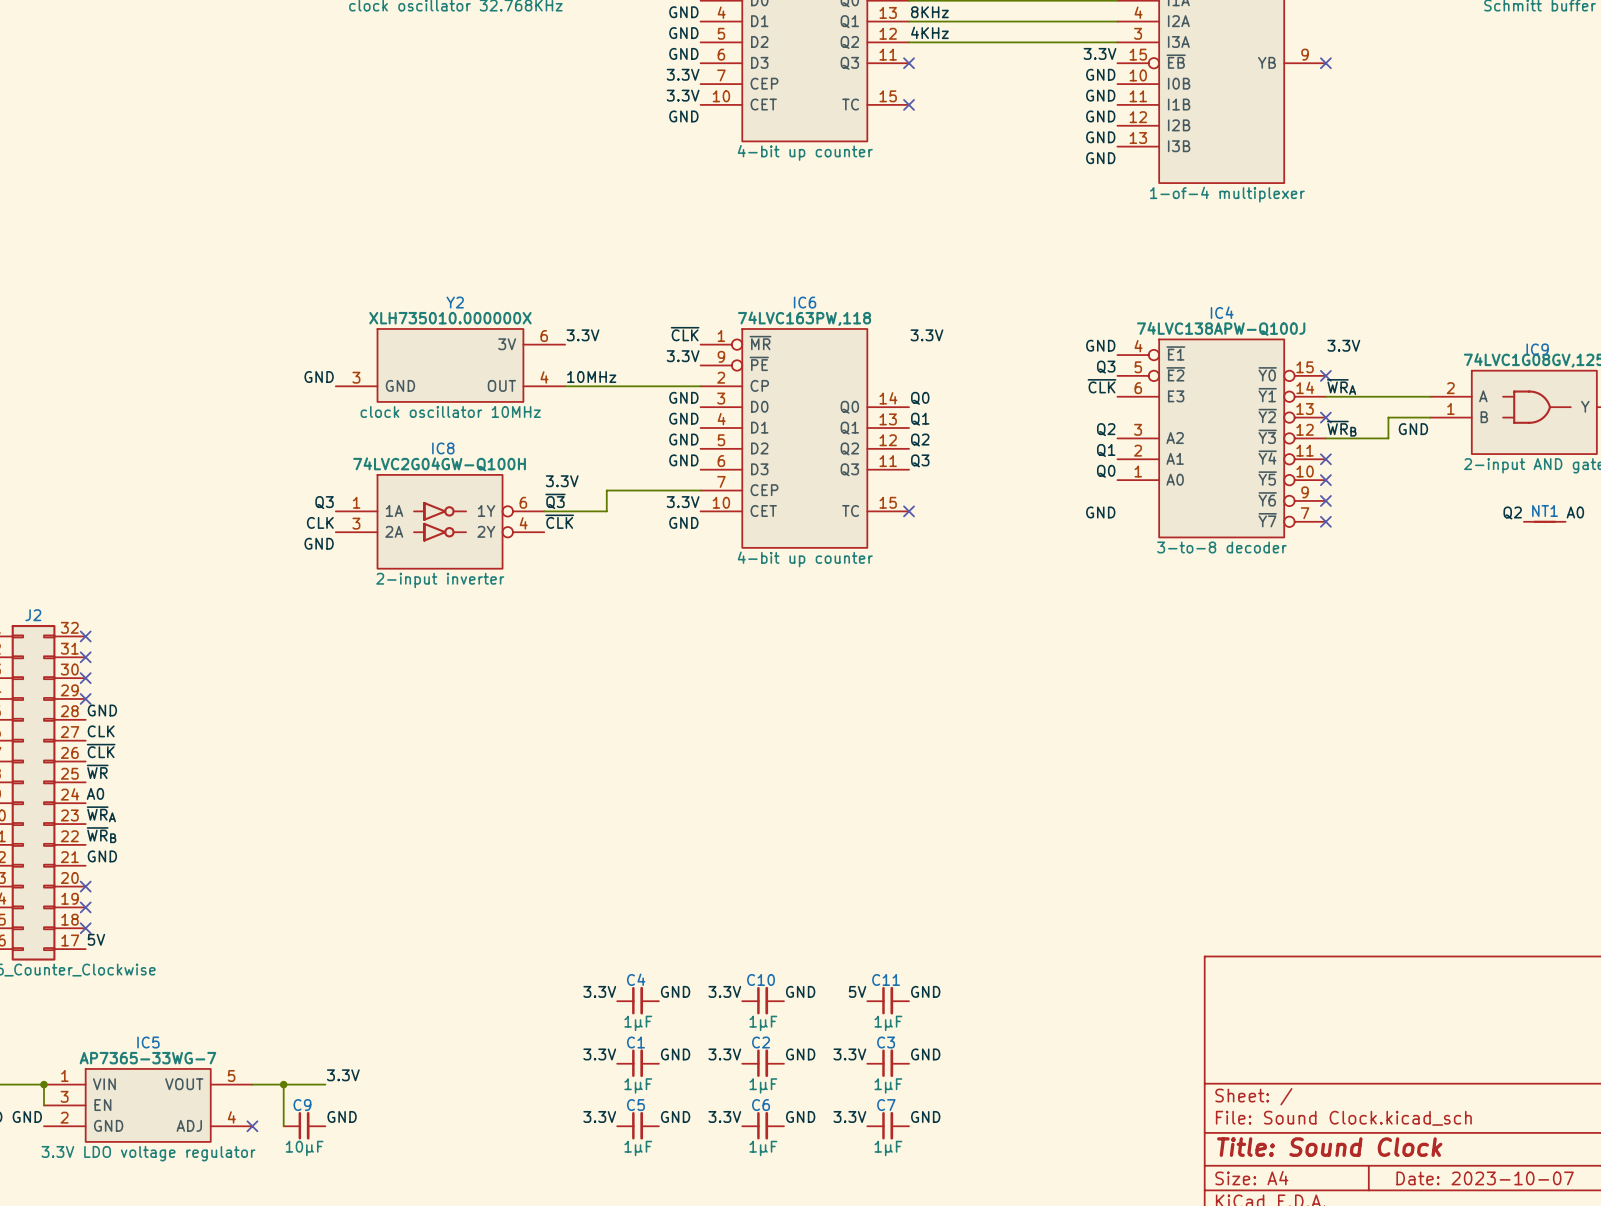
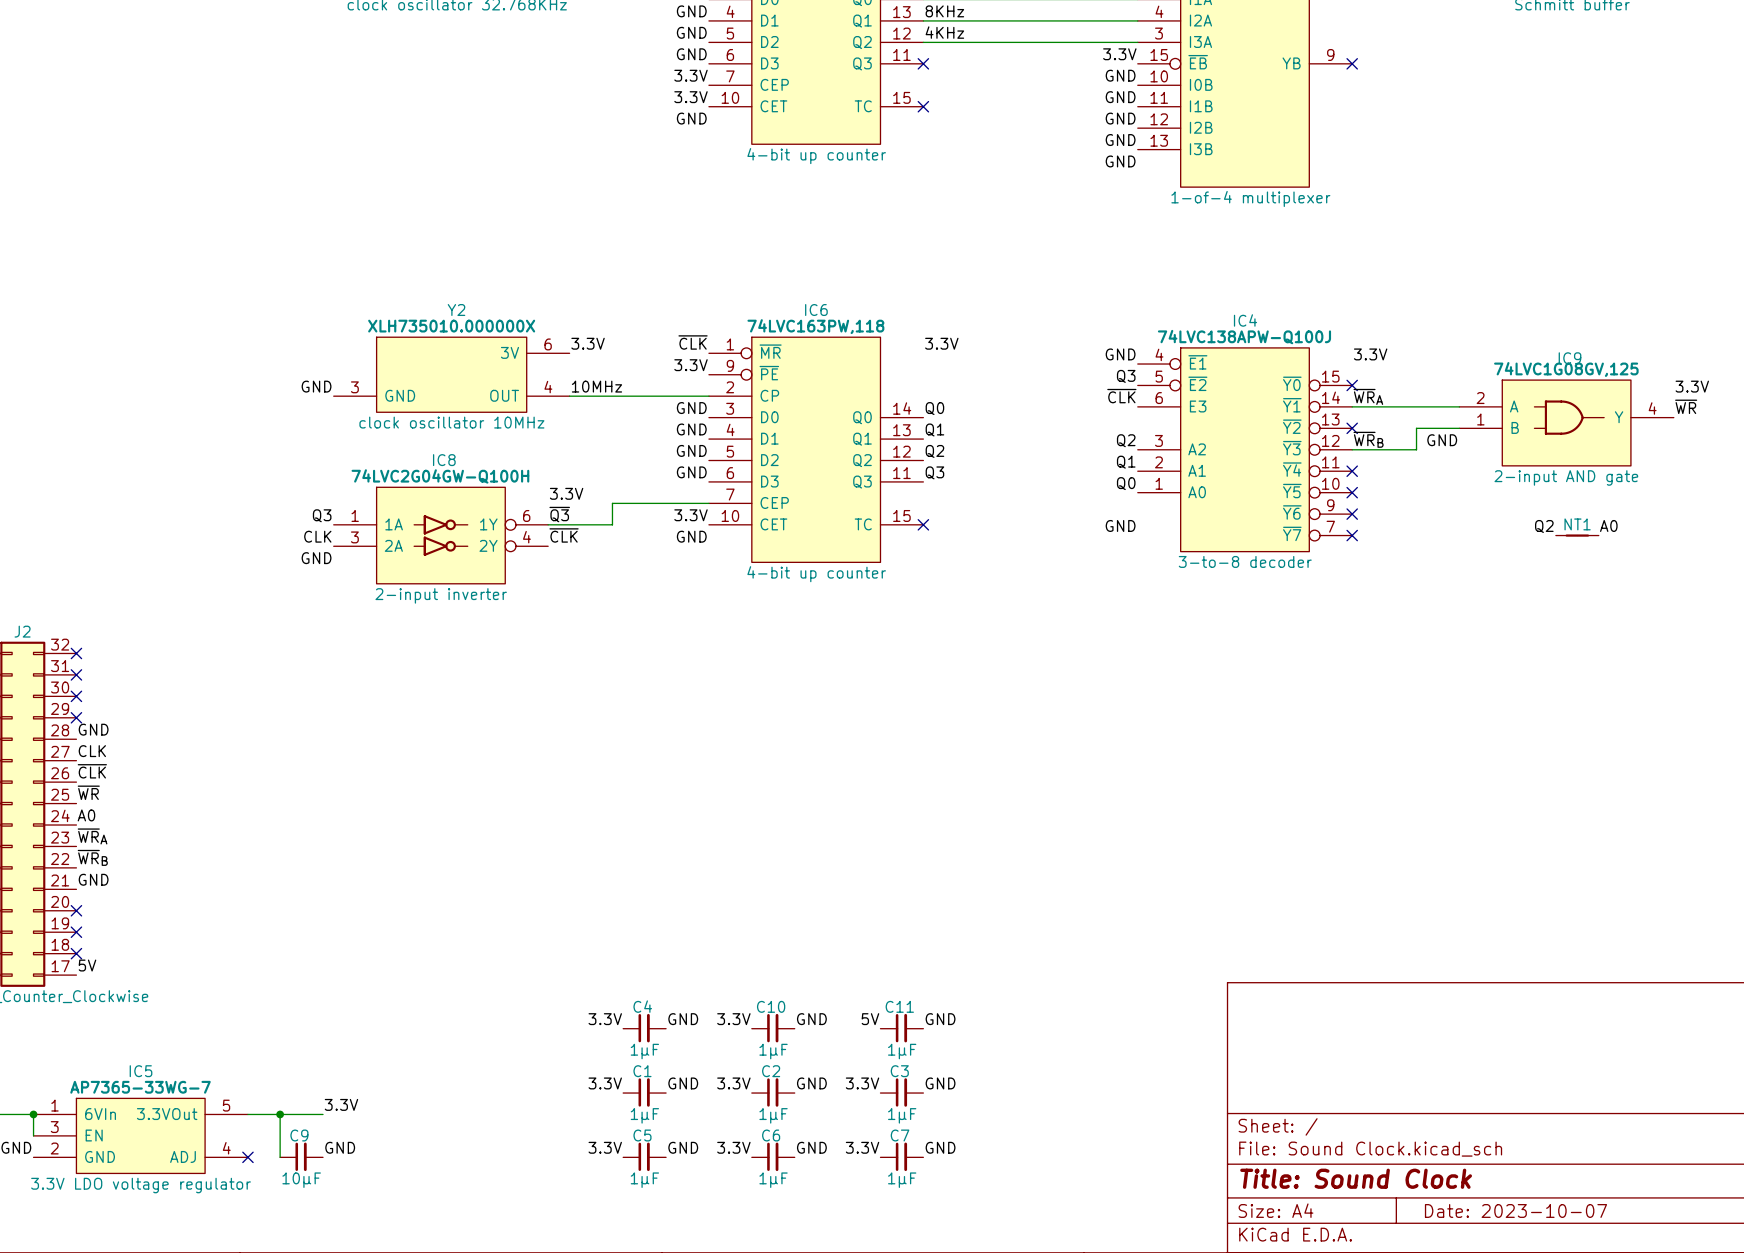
IC5 pin name: VIN (104, 1084) -> 6VIn (100, 1114)
IC5 pin name: VOUT (184, 1084) -> 3.3VOut (167, 1114)

